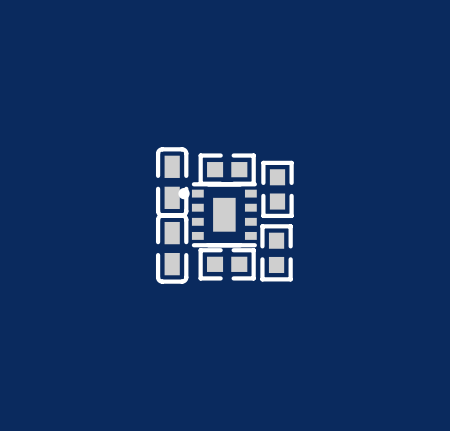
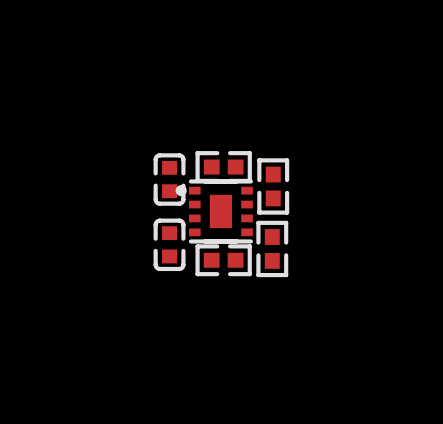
part footprint: [155, 147, 189, 218] -> [153, 153, 186, 206]
part footprint: [155, 213, 189, 284] -> [153, 218, 186, 272]

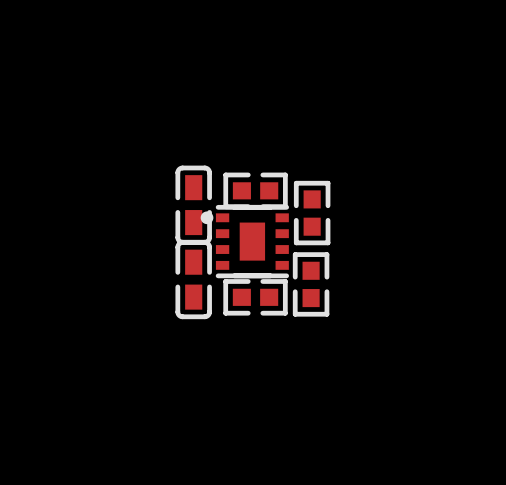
part footprint: [153, 153, 186, 206] -> [175, 165, 212, 245]
part footprint: [153, 218, 186, 272] -> [175, 240, 212, 320]

